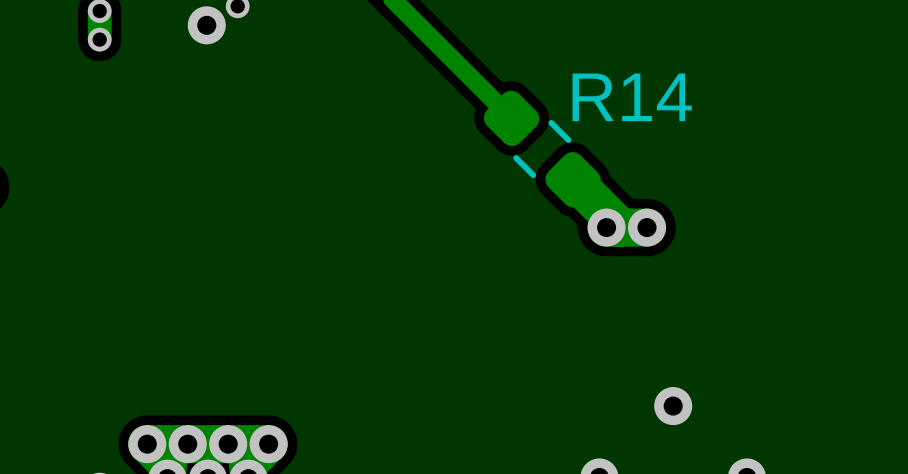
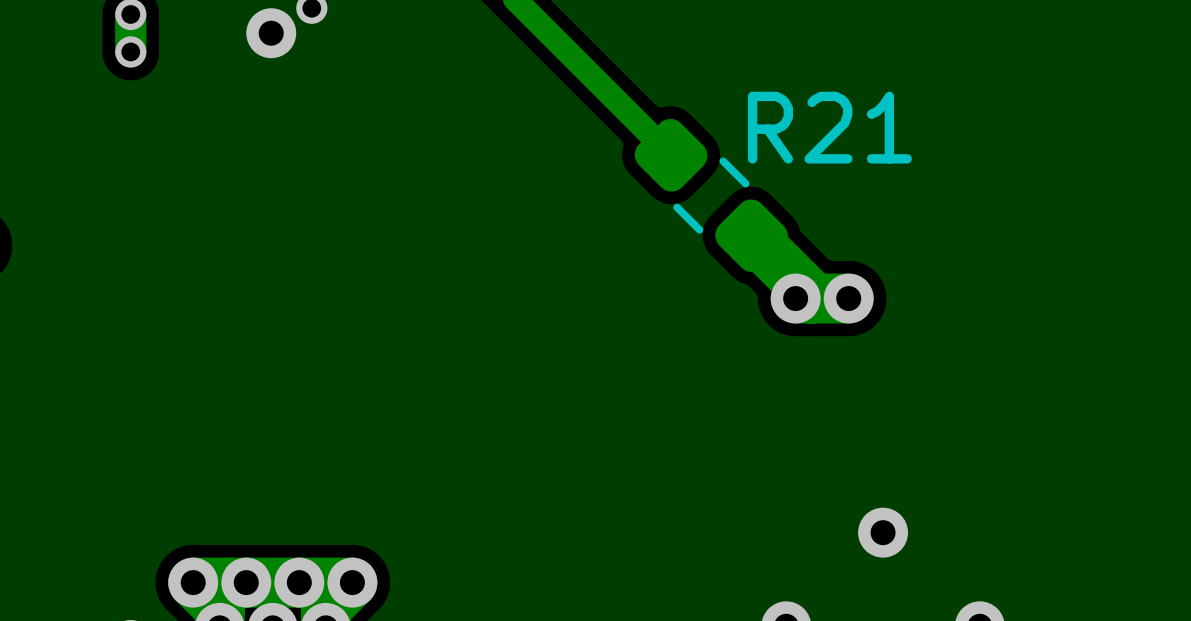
R14 name: R14 (632, 97) -> R21 (829, 127)

